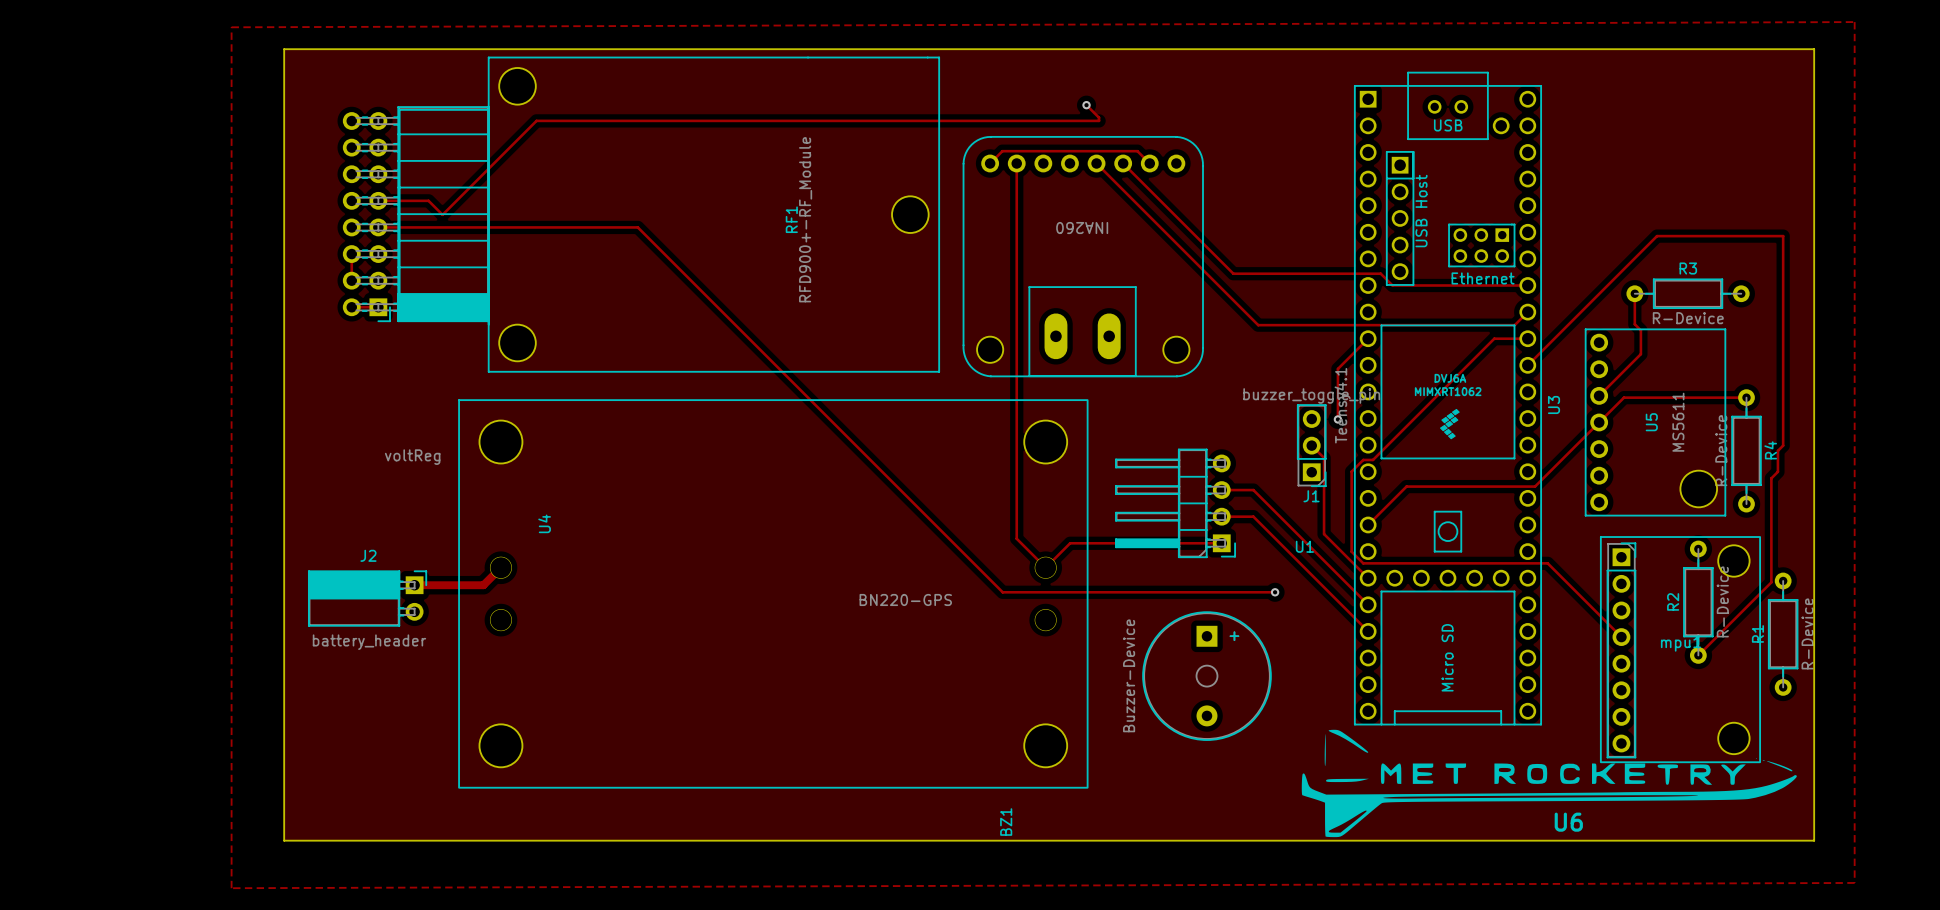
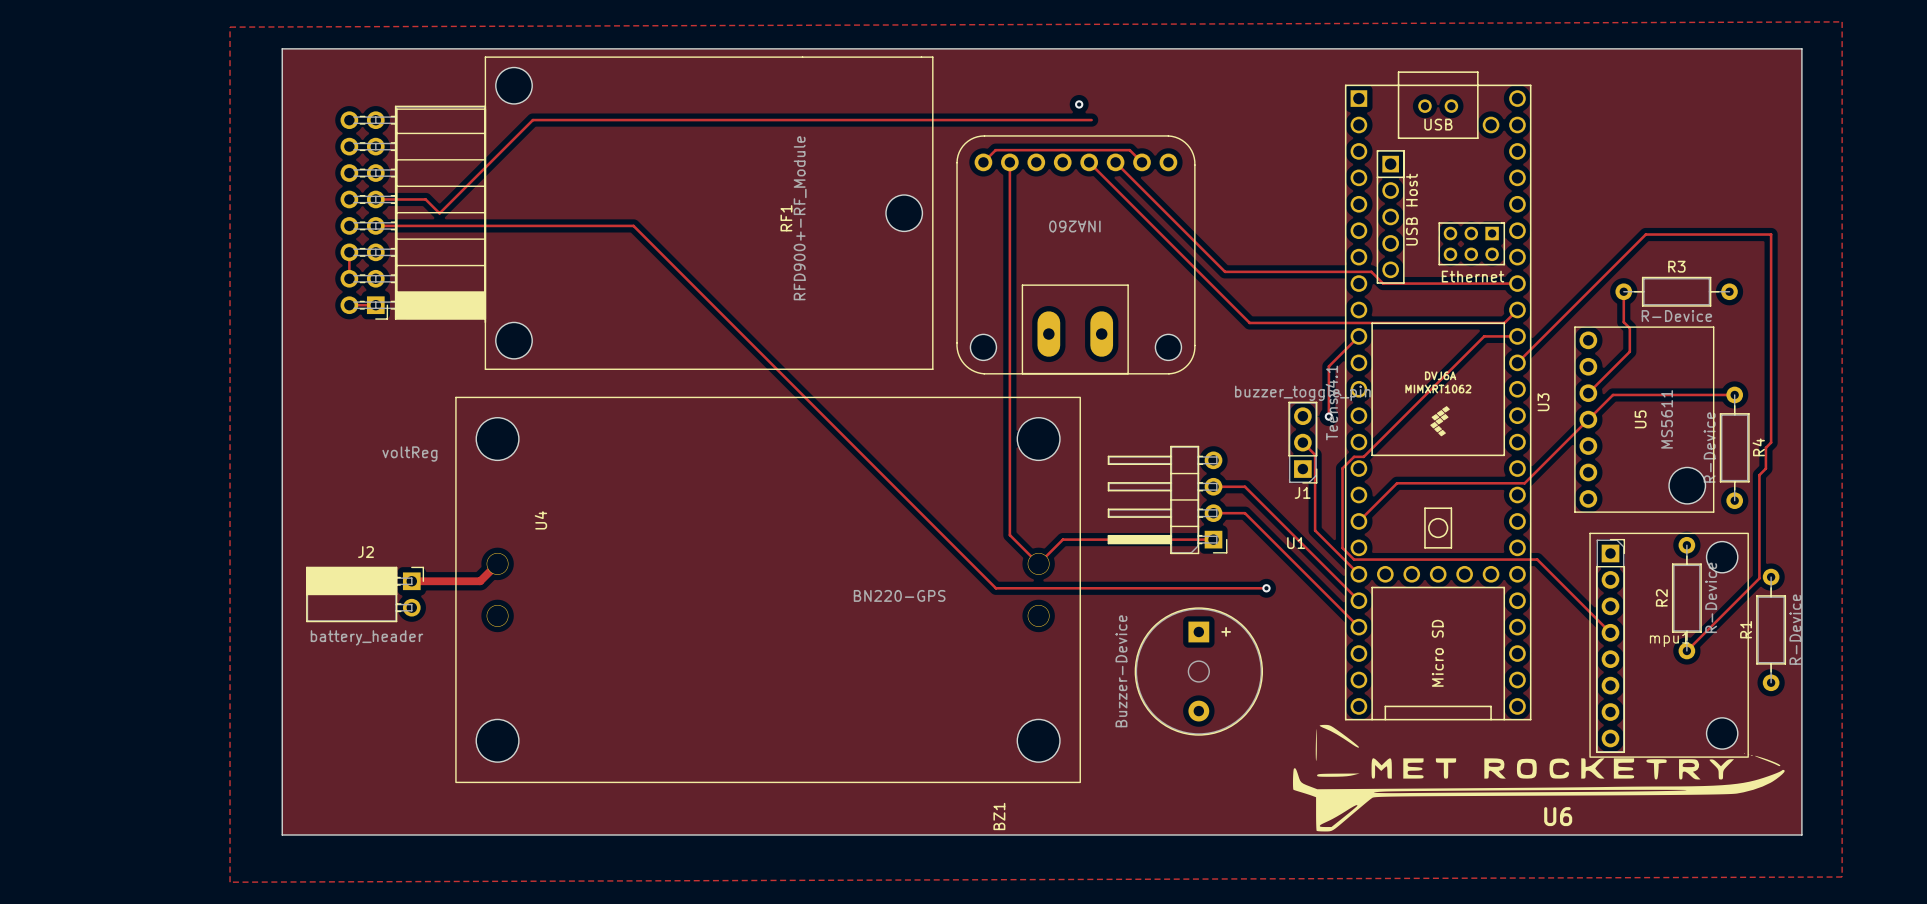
track: (1086, 105) (1099, 117) (1099, 120) -> none

